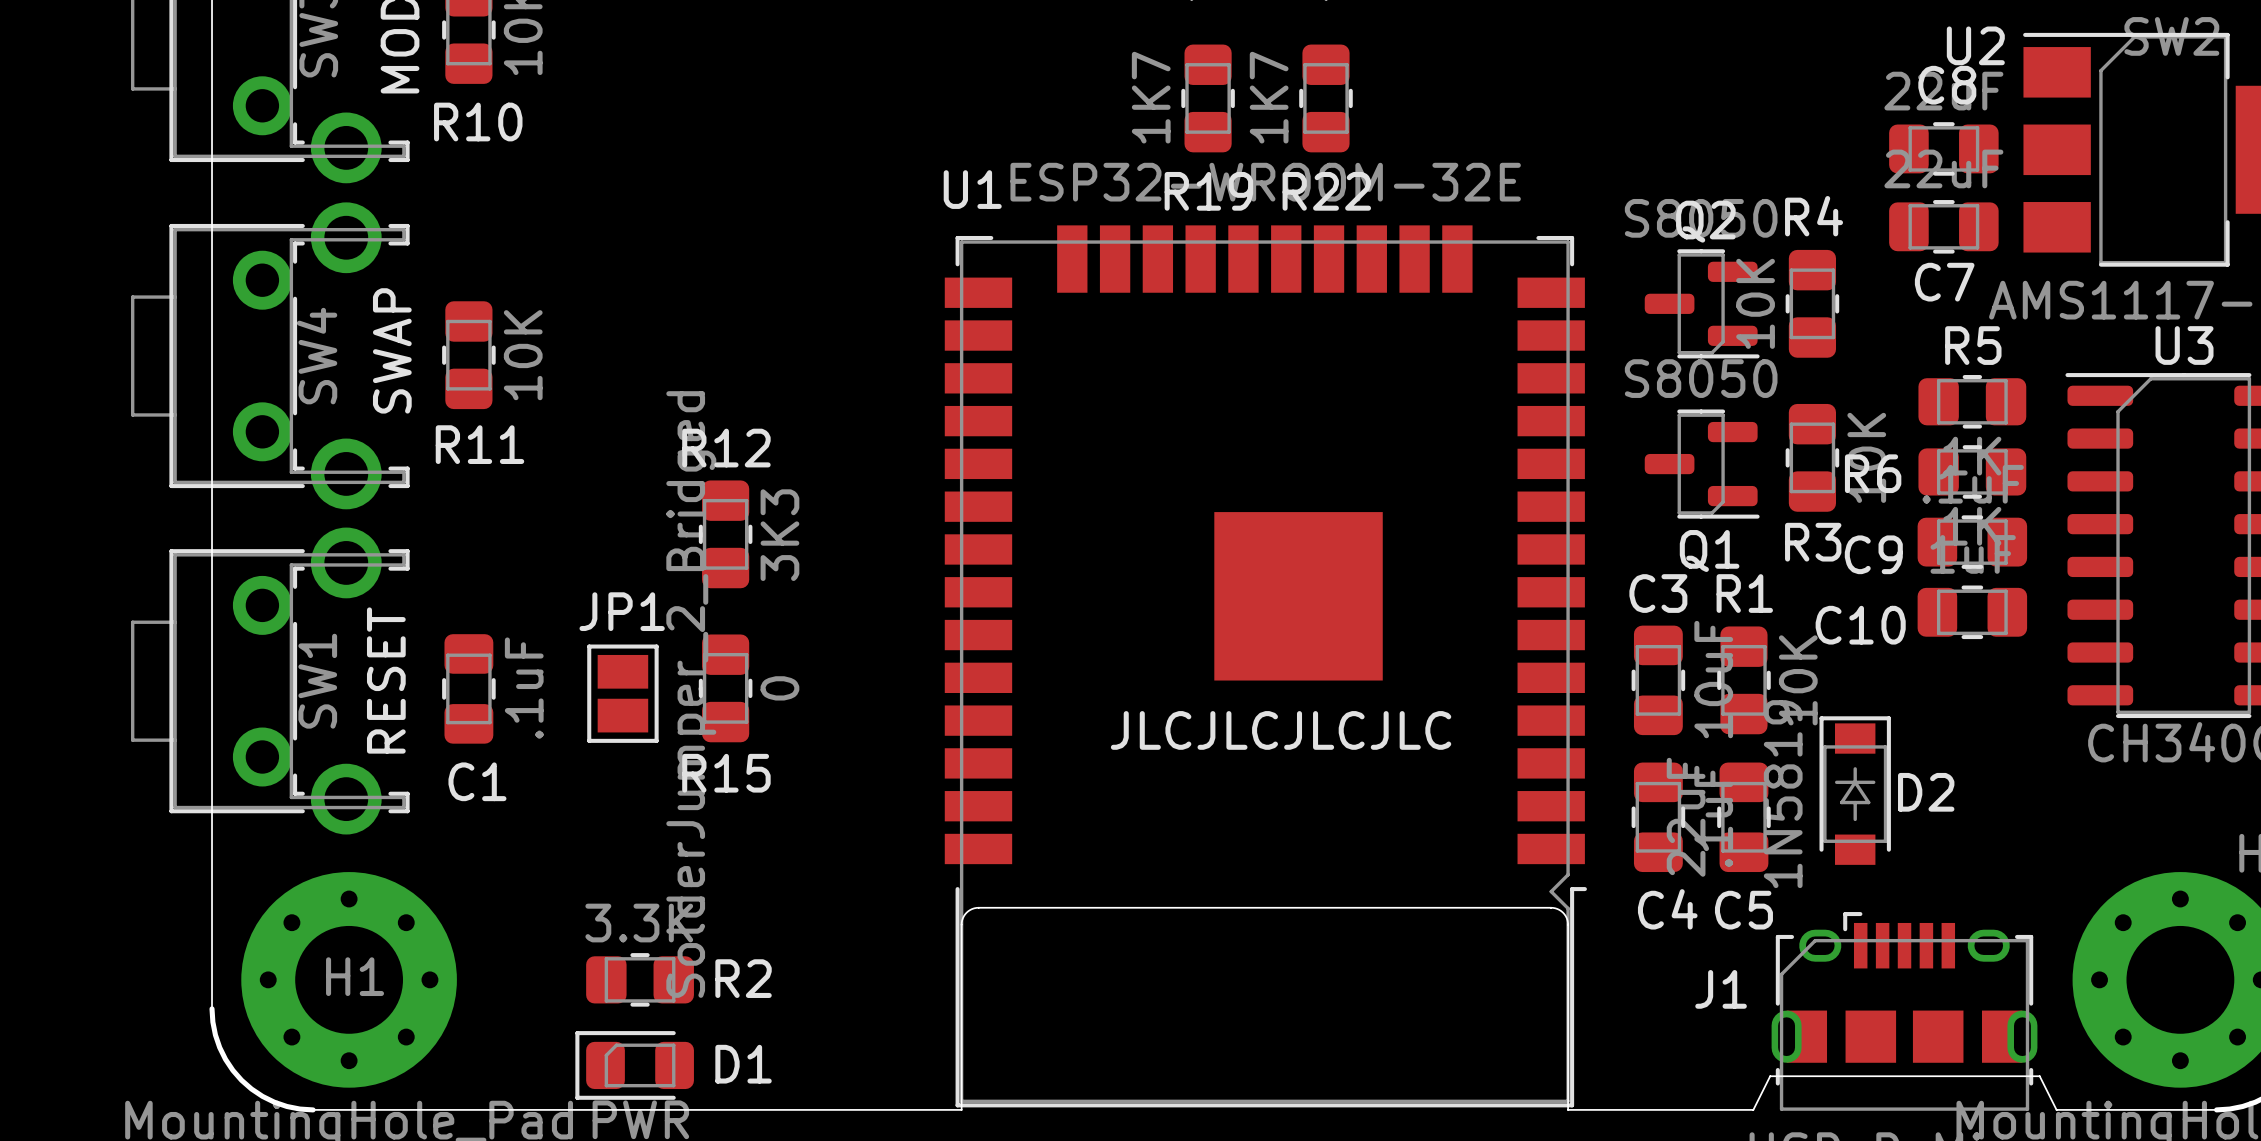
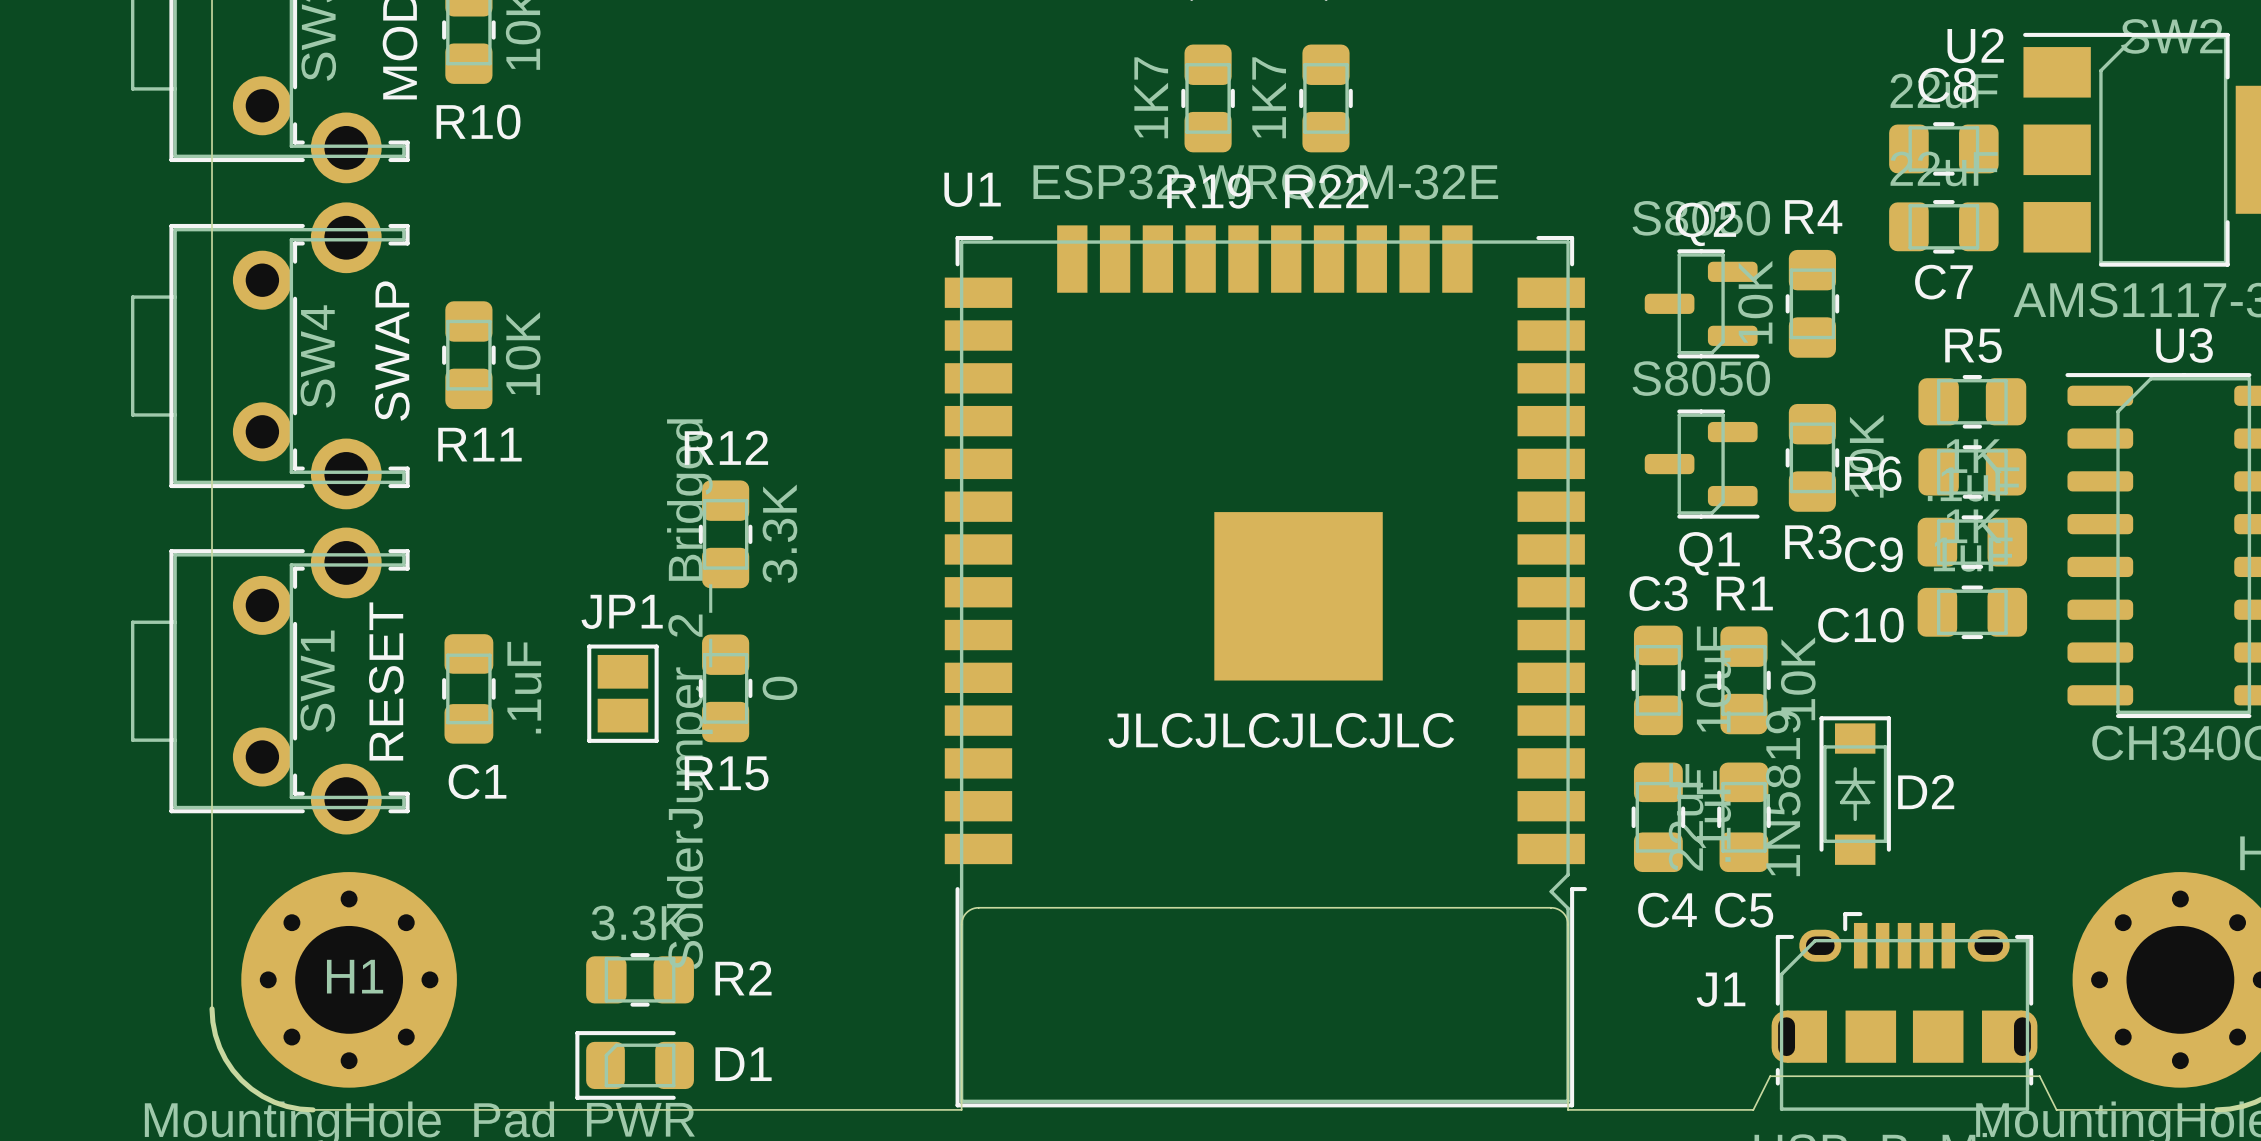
R12 value: 3K3 (779, 535) -> 3.3K (779, 533)

